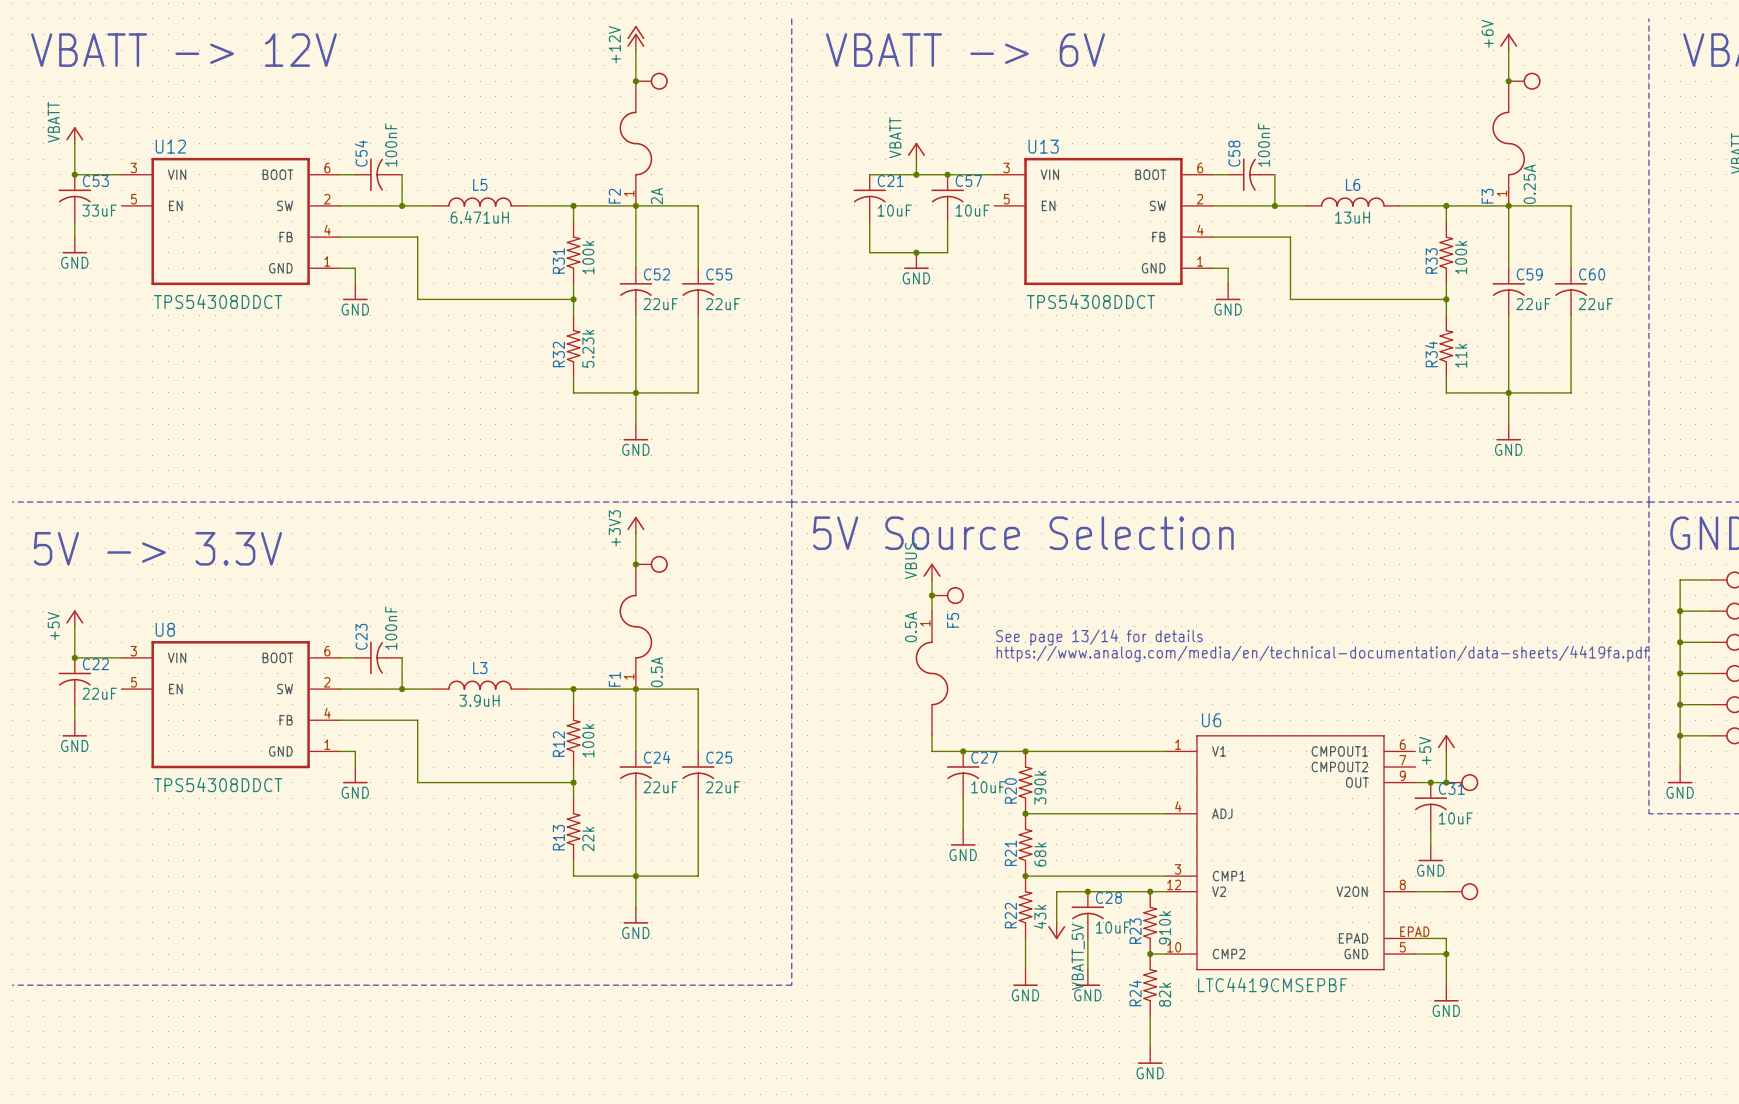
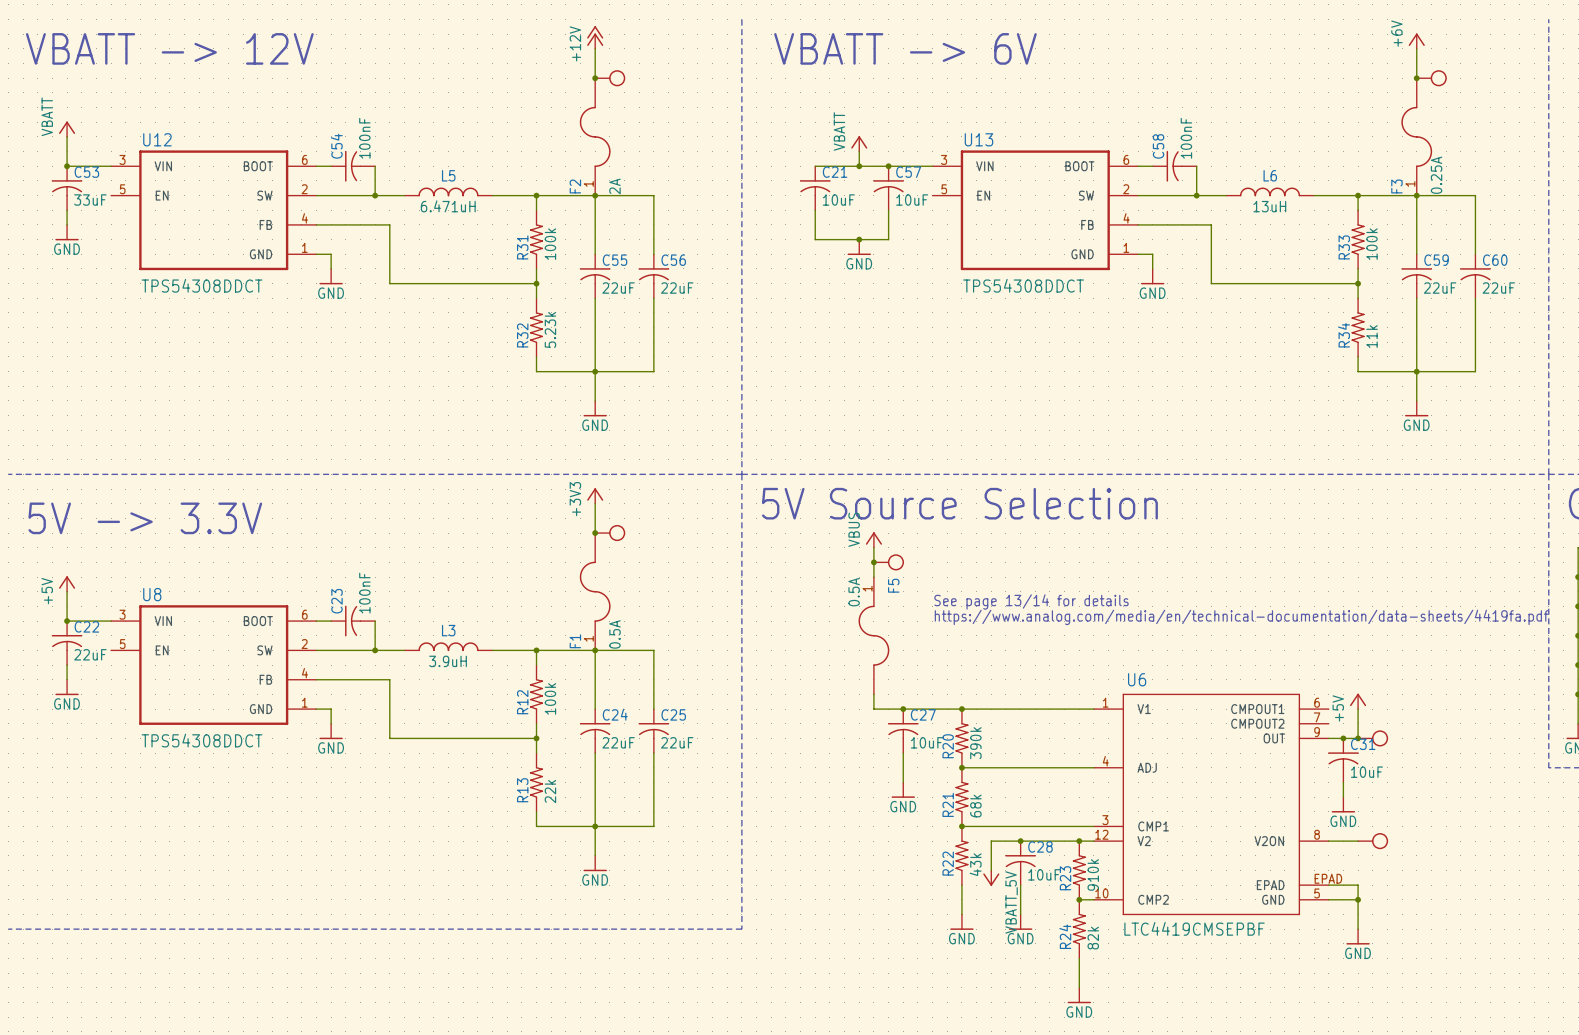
C52 name: C52 (656, 274) -> C55 (615, 260)
C55 name: C55 (719, 274) -> C56 (673, 260)

